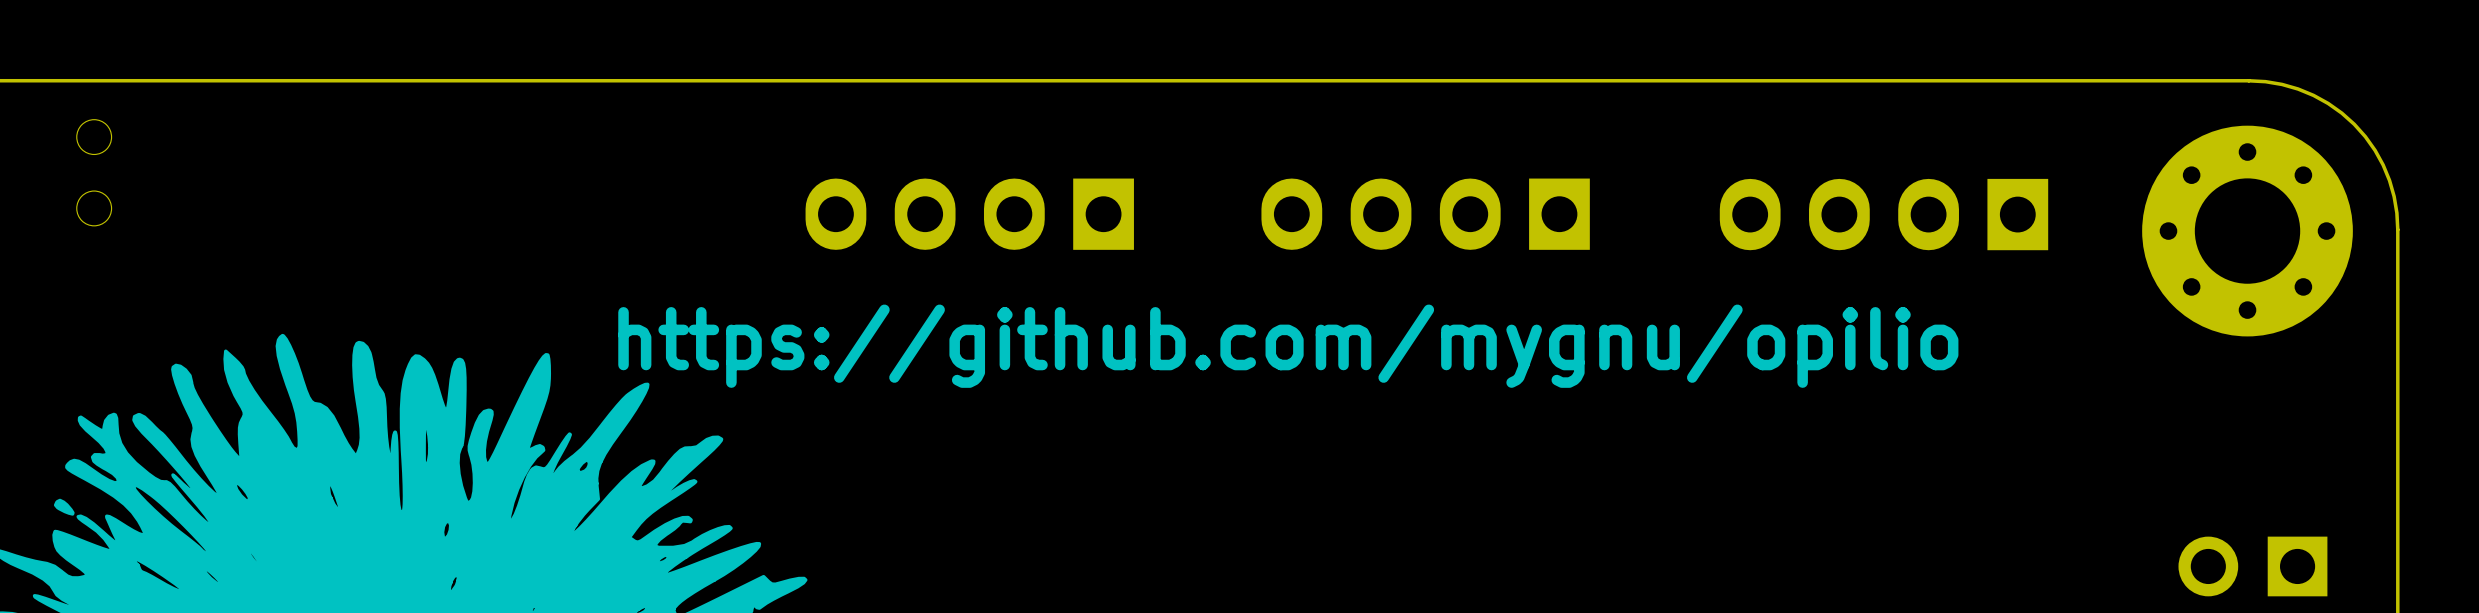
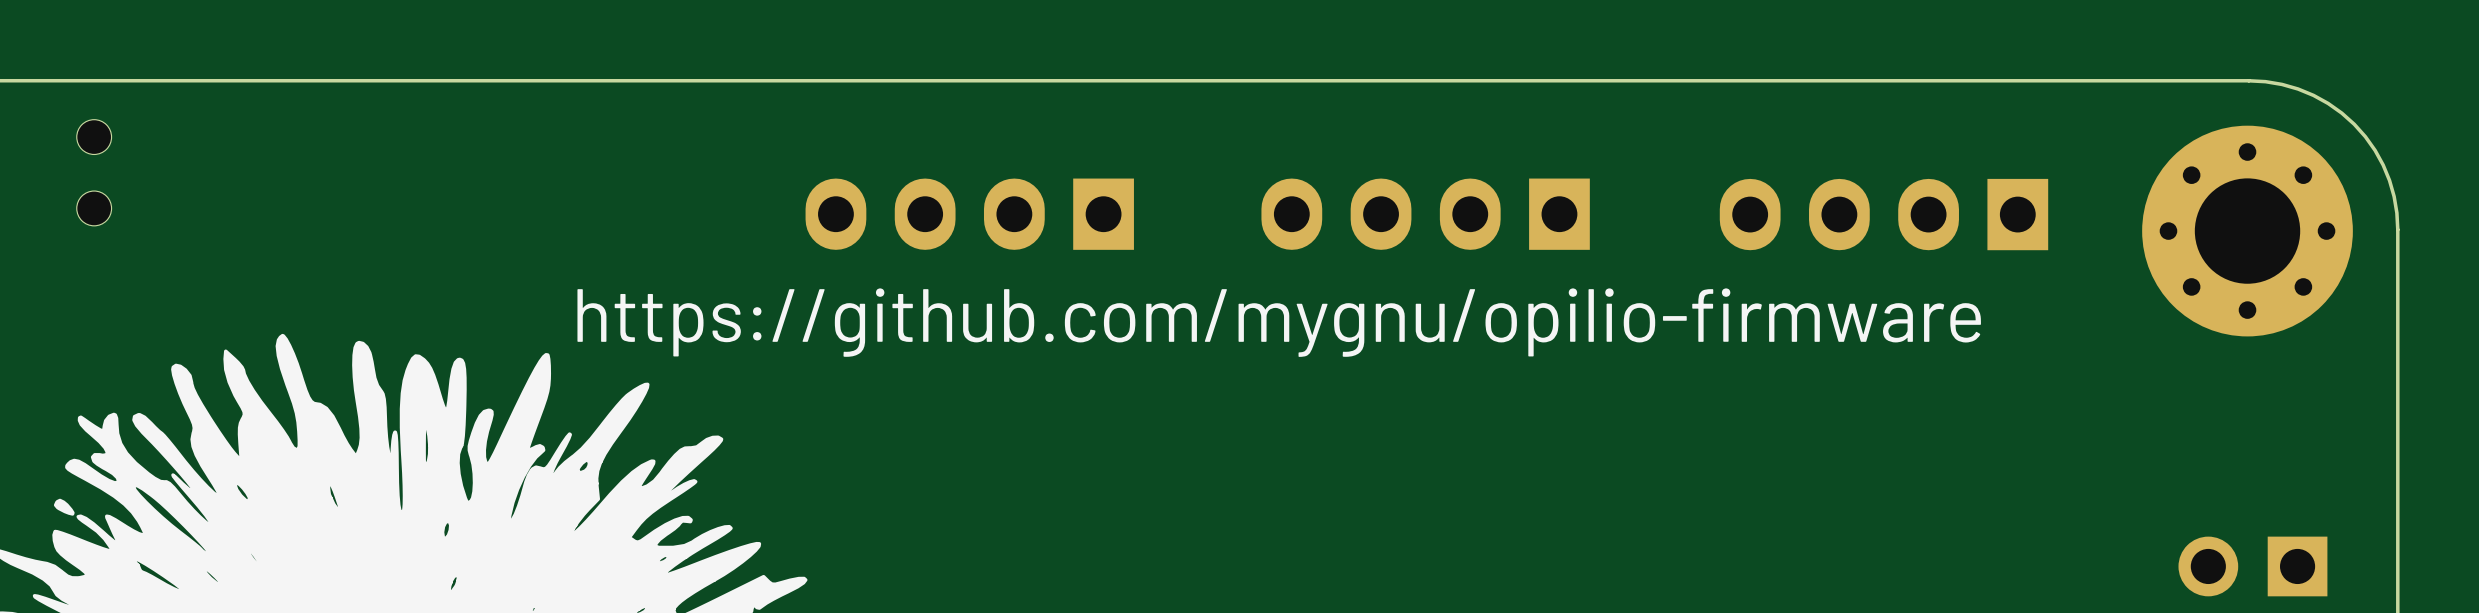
text: https://github.com/mygnu/opilio (1288, 346) -> https://github.com/mygnu/opilio-firmware (1279, 322)

